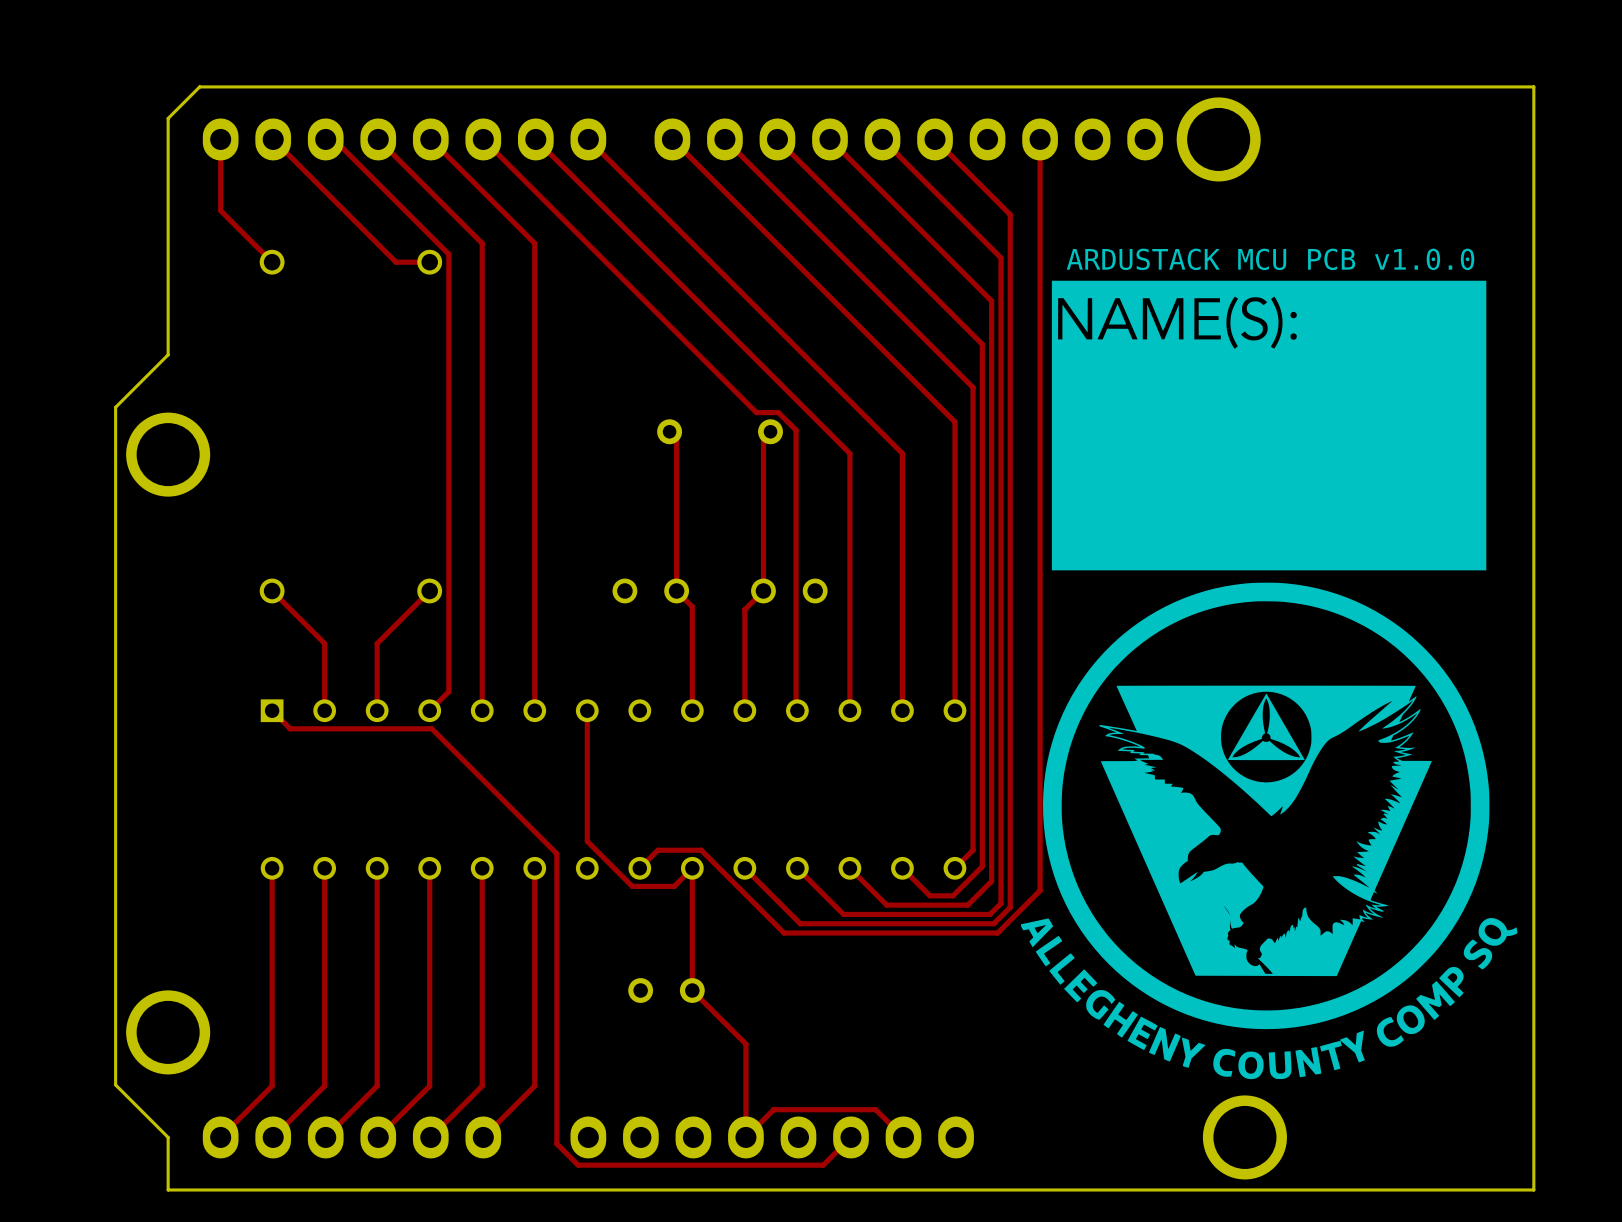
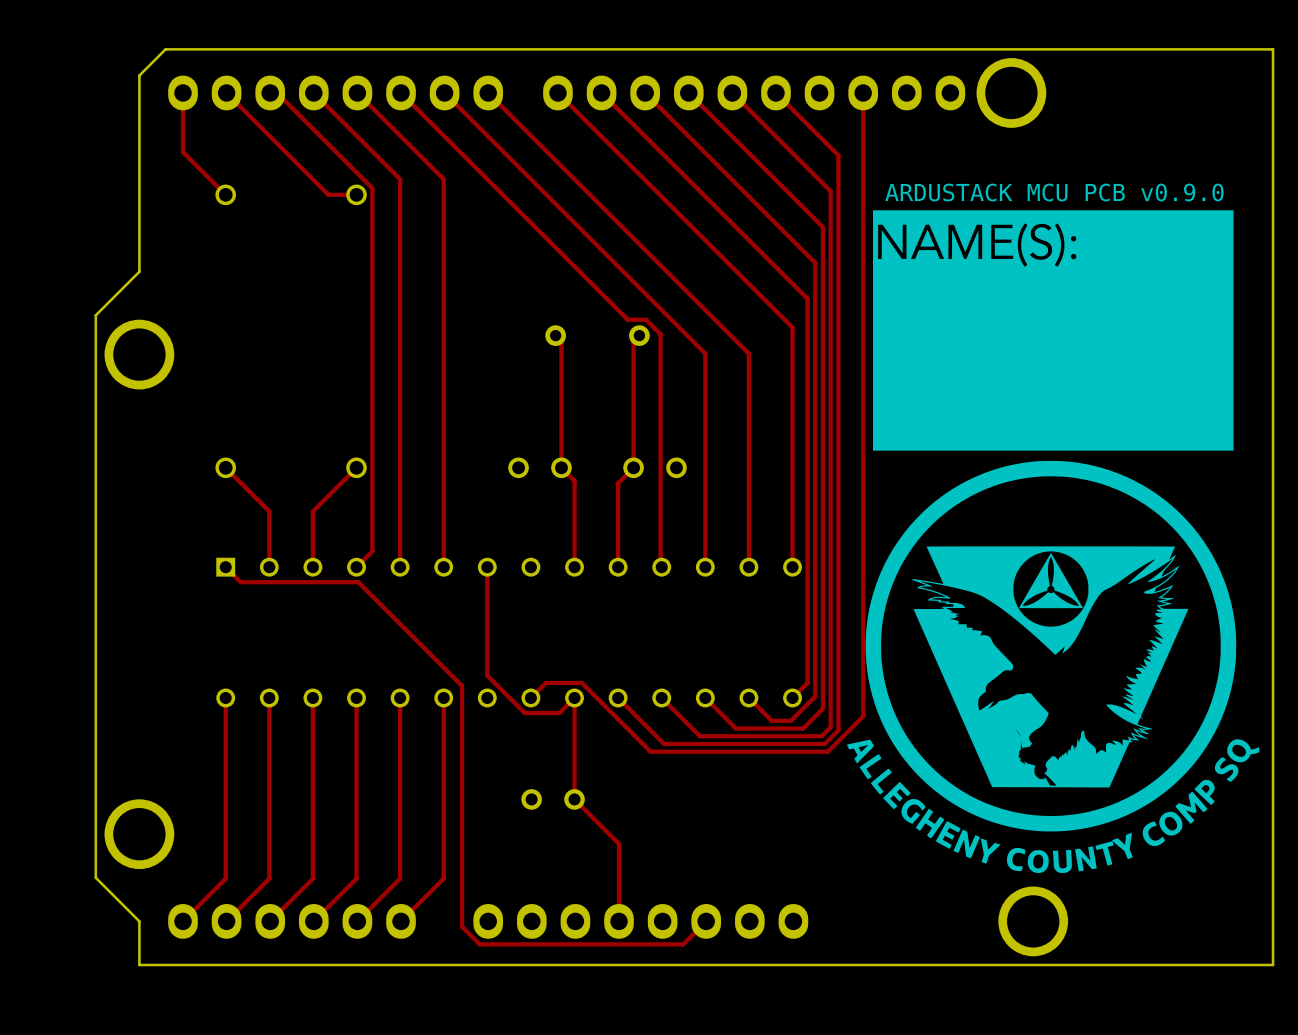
text: ARDUSTACK MCU PCB v1.0.0 (1270, 259) -> ARDUSTACK MCU PCB v0.9.0 (1054, 192)
top track: (903, 1137) (875, 1109) (773, 1109) (745, 1137) -> none

